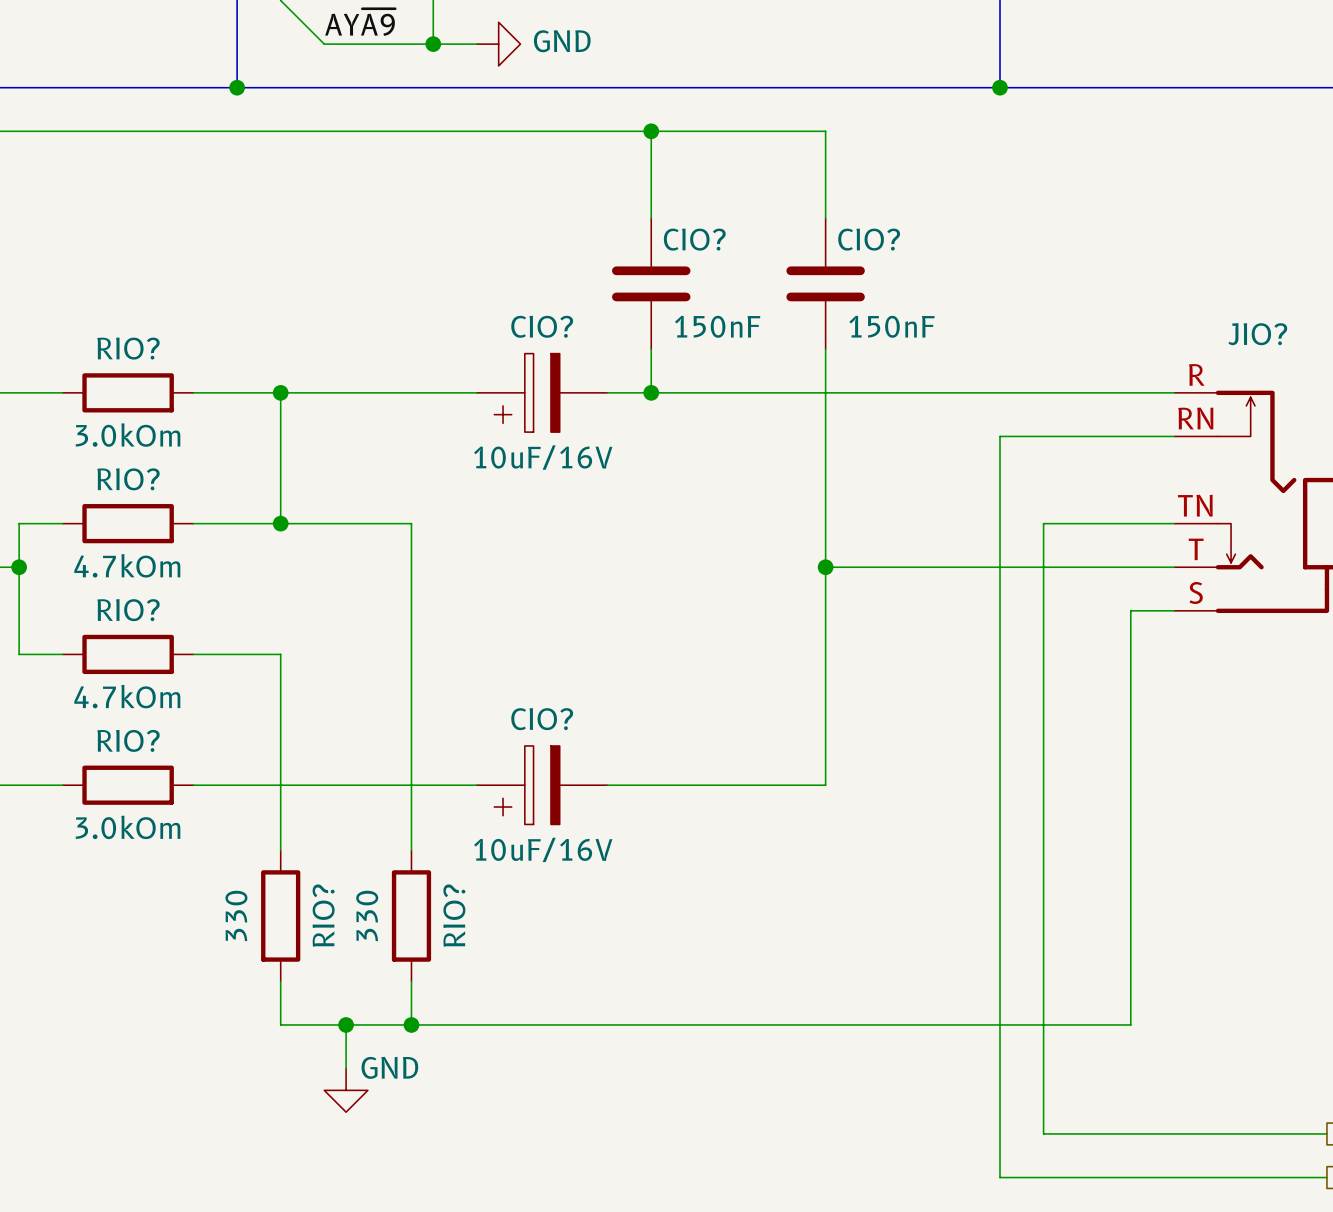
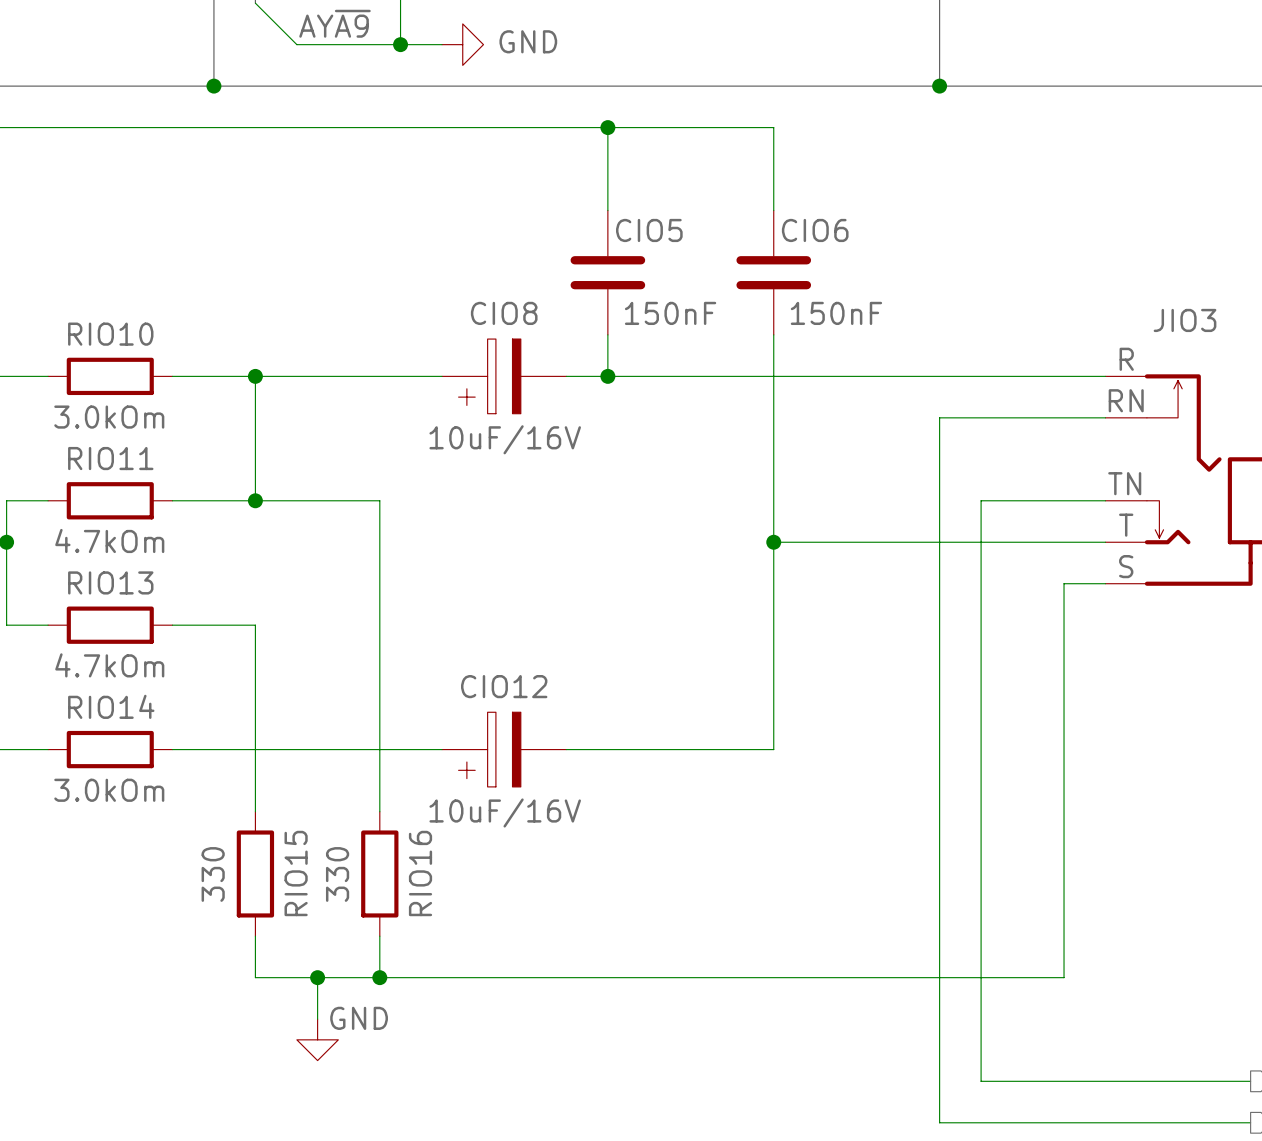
CIO? name: CIO? (694, 239) -> CIO5 (649, 230)
CIO? name: CIO? (869, 239) -> CIO6 (815, 230)
CIO? name: CIO? (542, 326) -> CIO8 (504, 313)
JIO? name: JIO? (1257, 334) -> JIO3 (1185, 320)
RIO? name: RIO? (128, 348) -> RIO10 (110, 334)
RIO? name: RIO? (128, 479) -> RIO11 (110, 458)
RIO? name: RIO? (128, 610) -> RIO13 (110, 582)
CIO? name: CIO? (542, 719) -> CIO12 (504, 686)
RIO? name: RIO? (128, 740) -> RIO14 (111, 706)
RIO? name: RIO? (323, 915) -> RIO15 (296, 873)
RIO? name: RIO? (454, 915) -> RIO16 (420, 873)

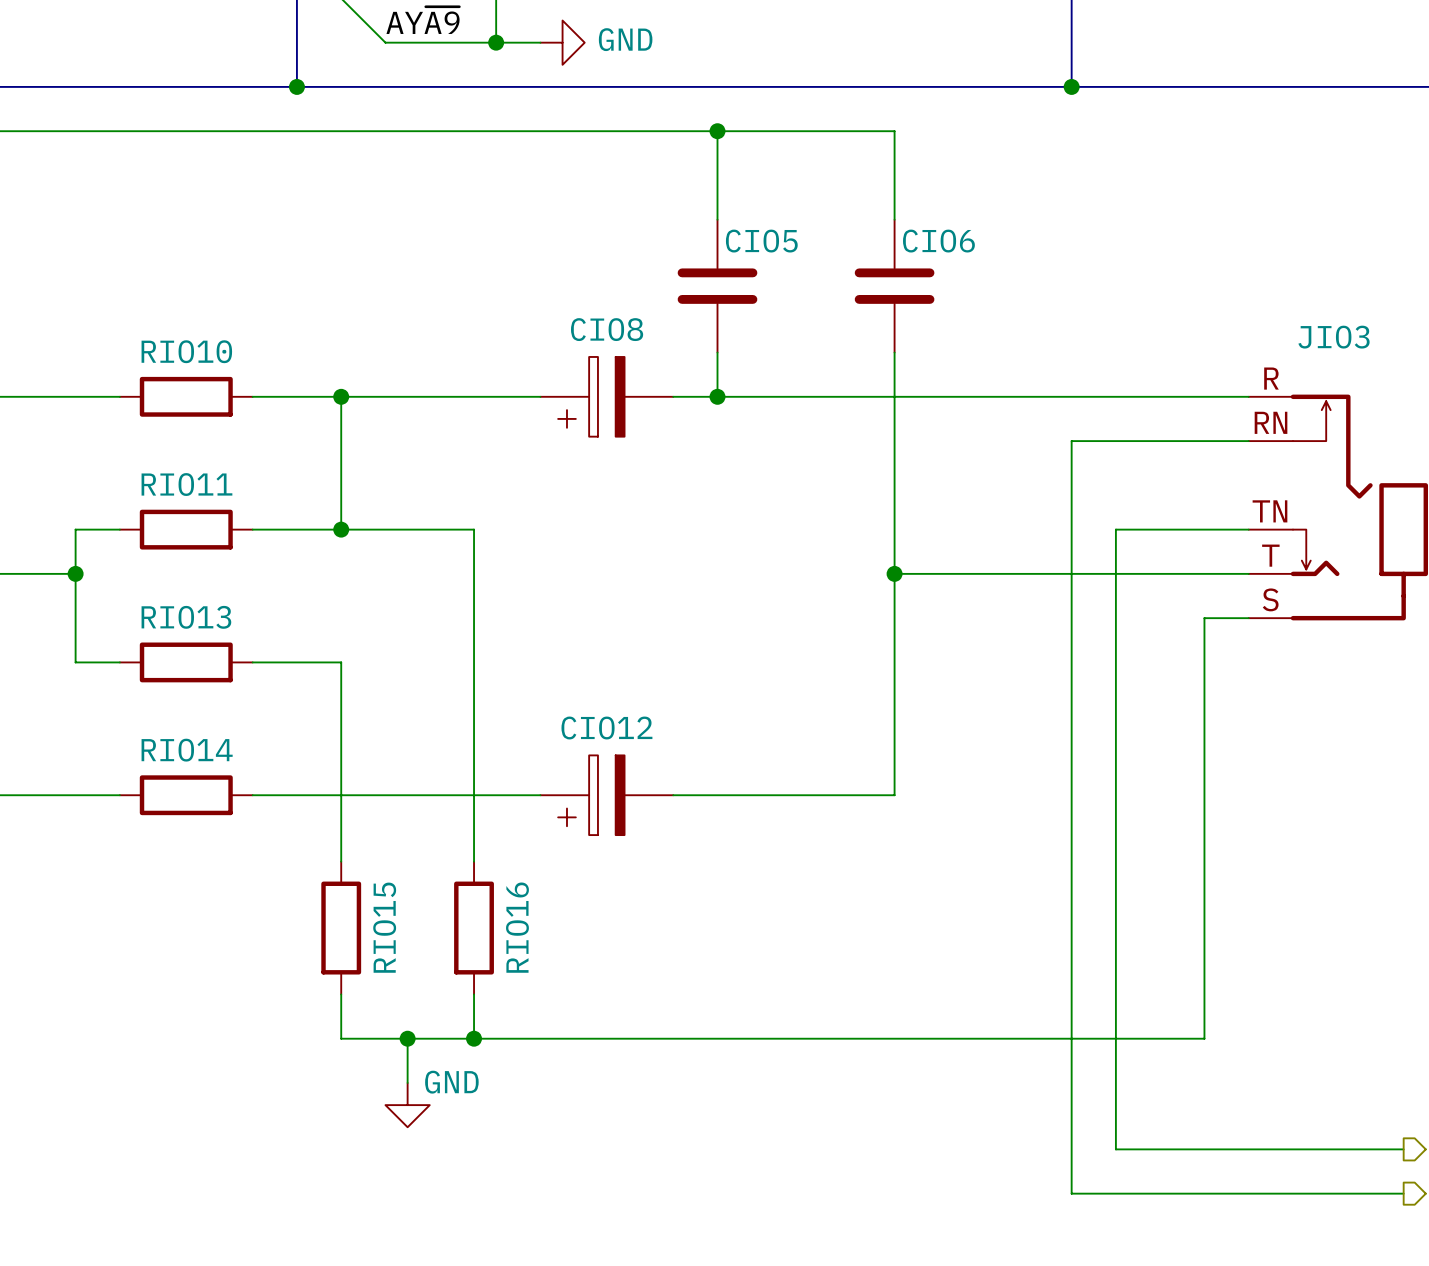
CIO5 value: 150nF (670, 313) -> none
CIO6 value: 150nF (836, 313) -> none
RIO10 value: 3.0kOm (109, 417) -> none
CIO8 value: 10uF/16V (505, 439) -> none
RIO11 value: 4.7kOm (109, 540) -> none
RIO13 value: 4.7kOm (109, 665) -> none
RIO14 value: 3.0kOm (109, 790) -> none
CIO12 value: 10uF/16V (505, 812) -> none
RIO15 value: 330 (213, 874) -> none
RIO16 value: 330 (337, 874) -> none

